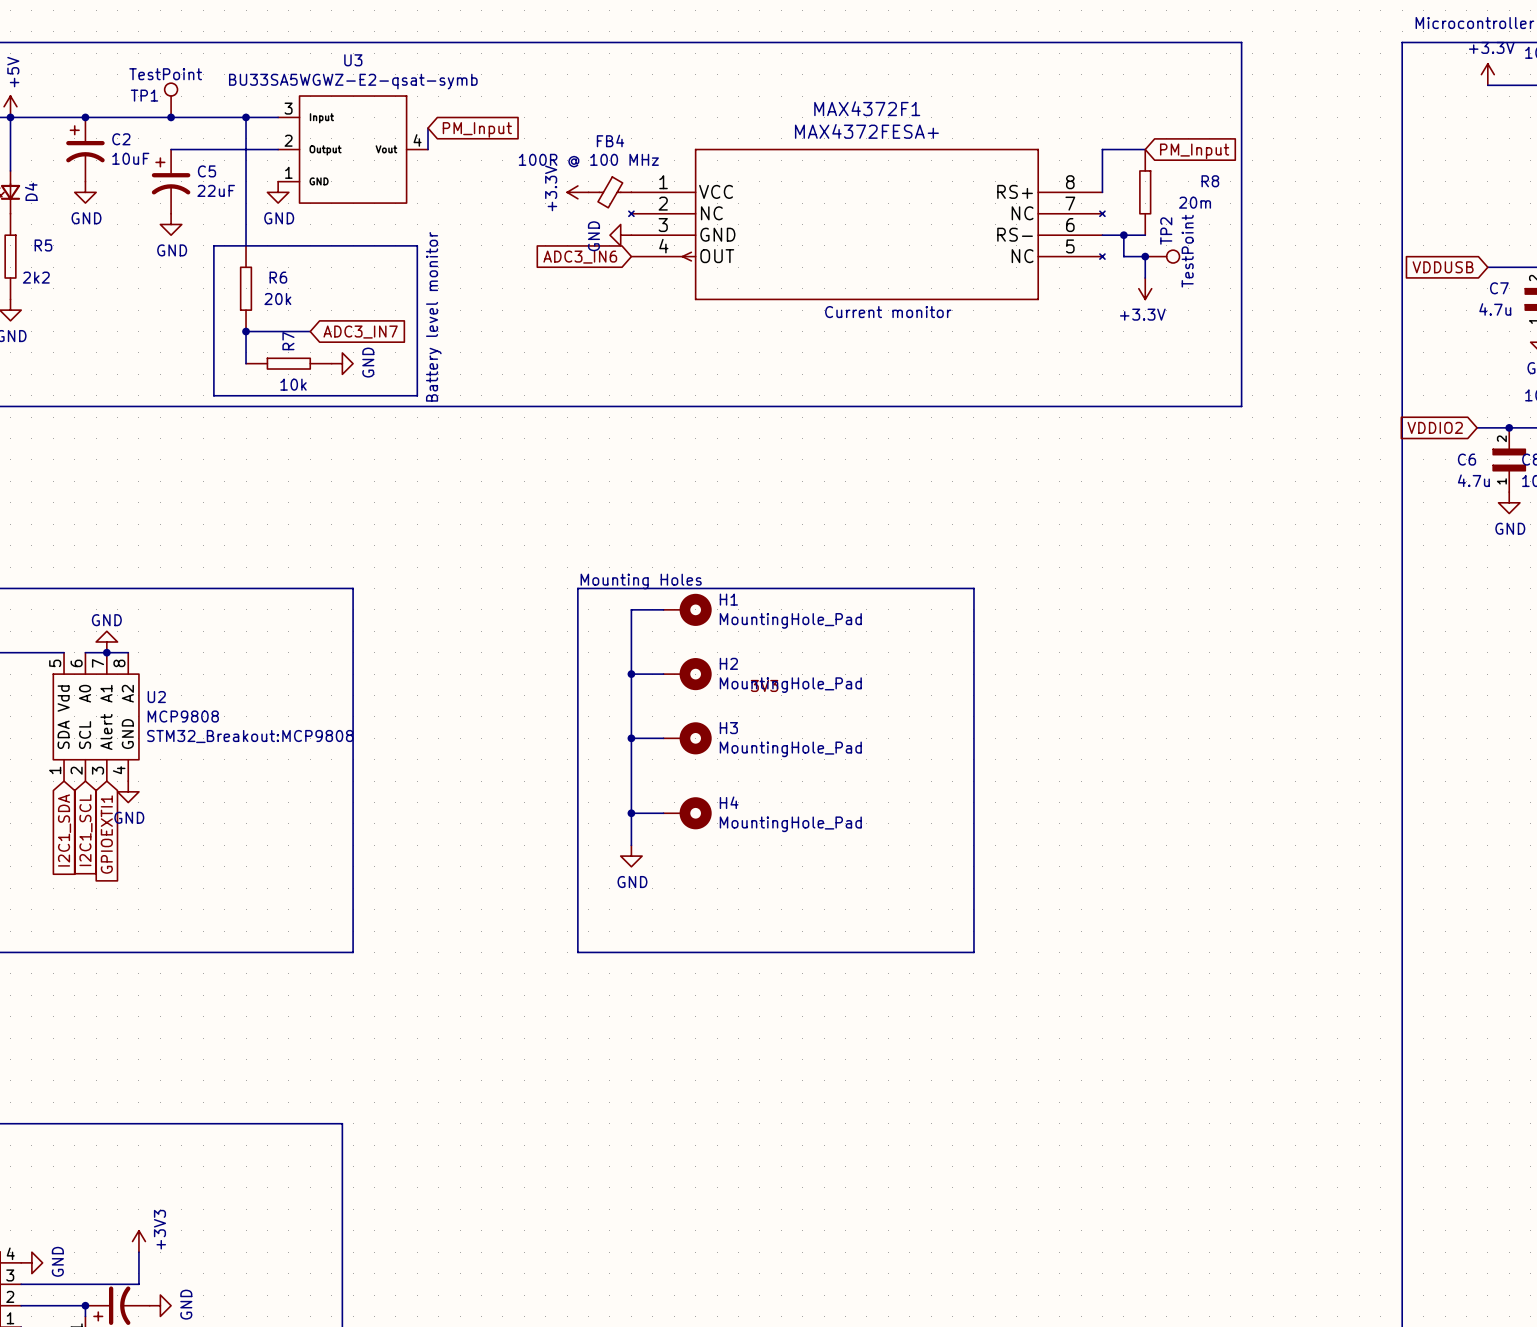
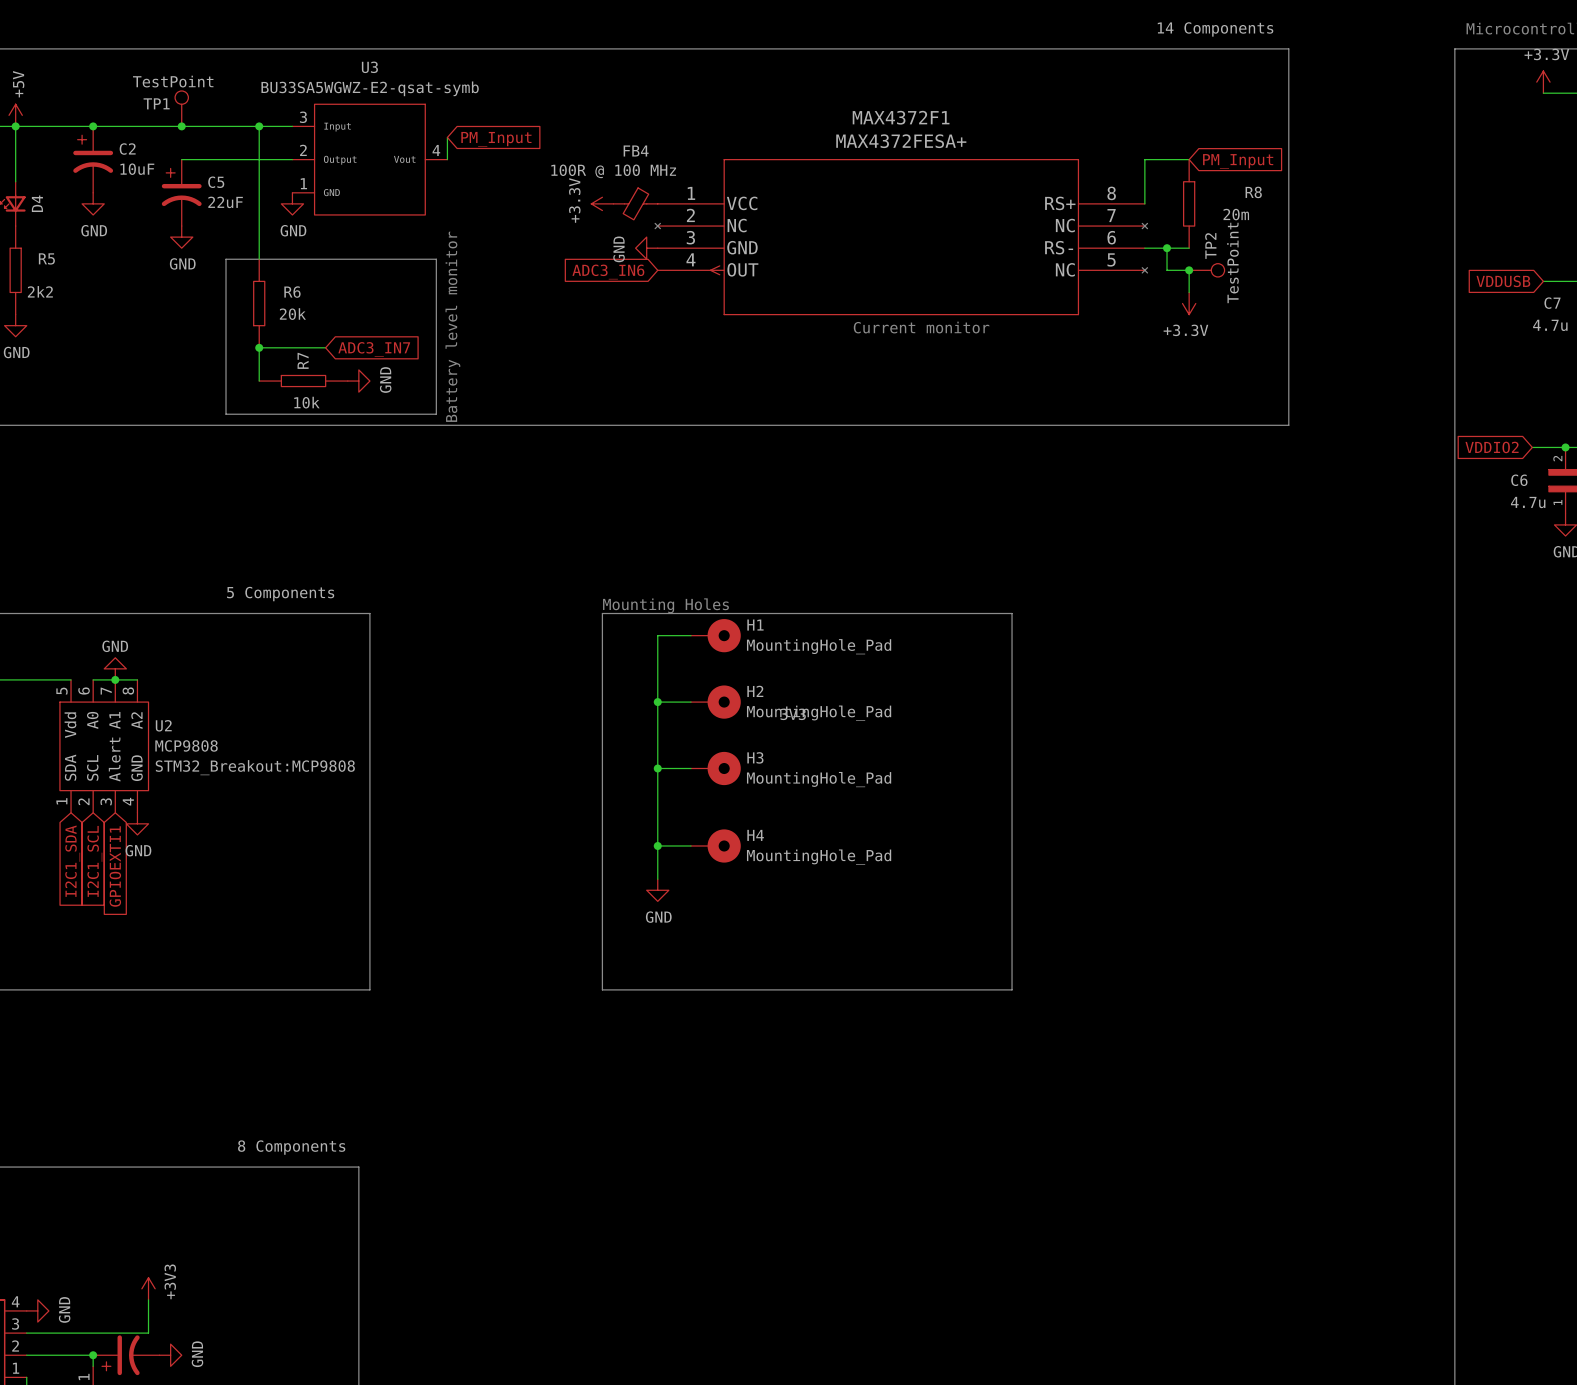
label: none -> 14 Components (1215, 29)
label: none -> 5 Components (280, 594)
label: none -> 8 Components (291, 1147)

